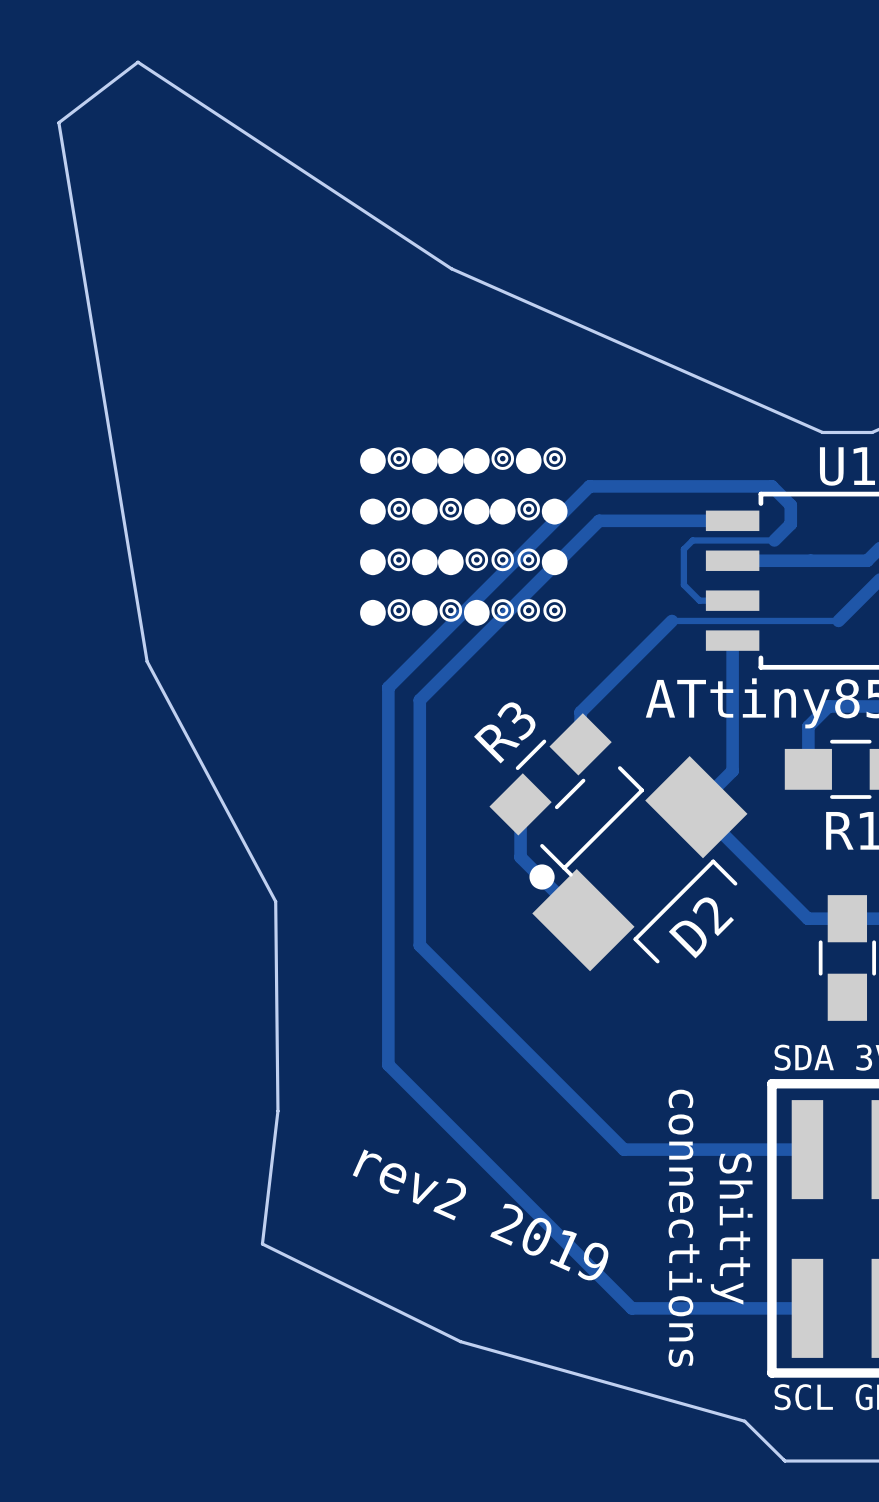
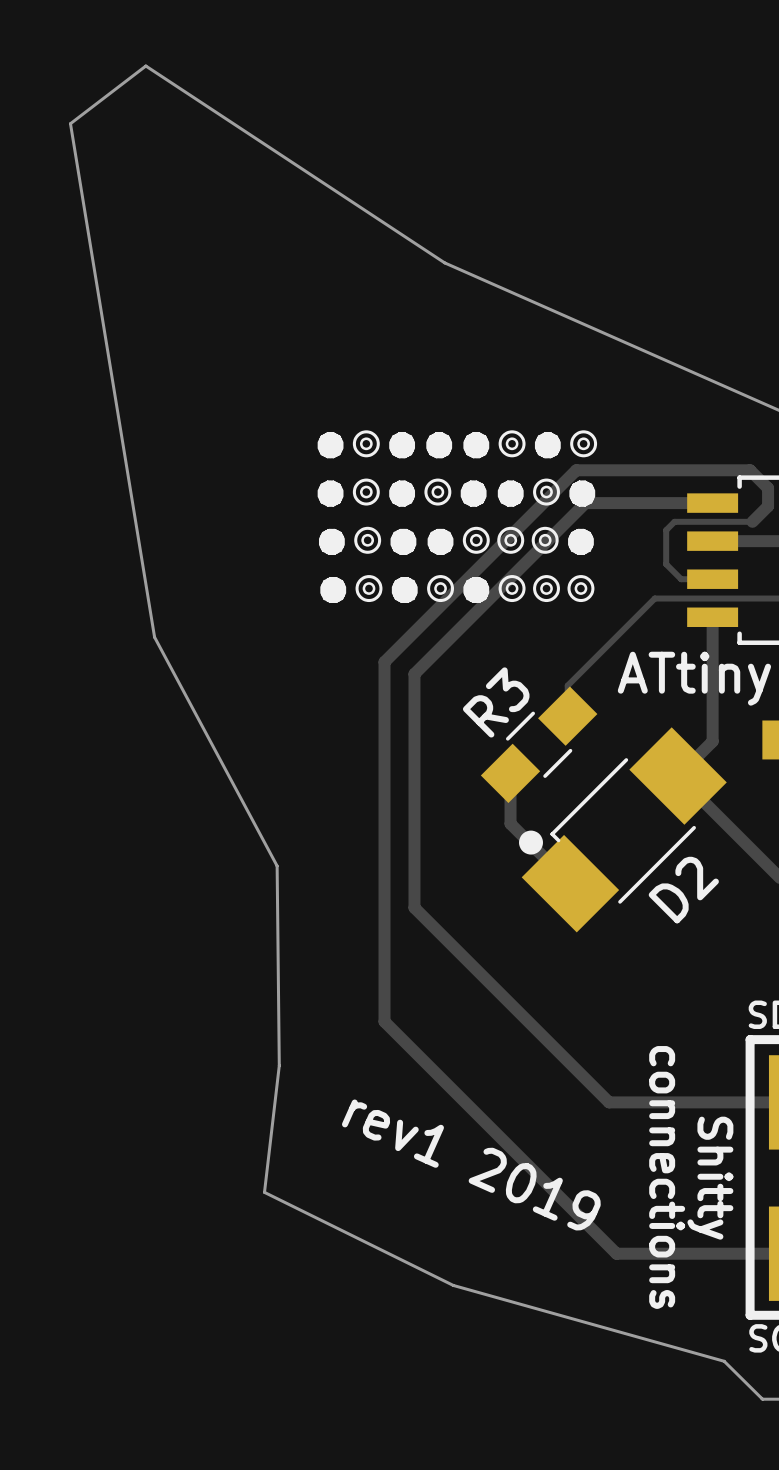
track width: thick (671, 620) (580, 712) (580, 744) -> thin (654, 598) (567, 685) (567, 716)
D2 footprint: [529, 756, 748, 972] -> [519, 727, 727, 933]
text: rev2 2019 (480, 1215) -> rev1 2019 (471, 1164)

